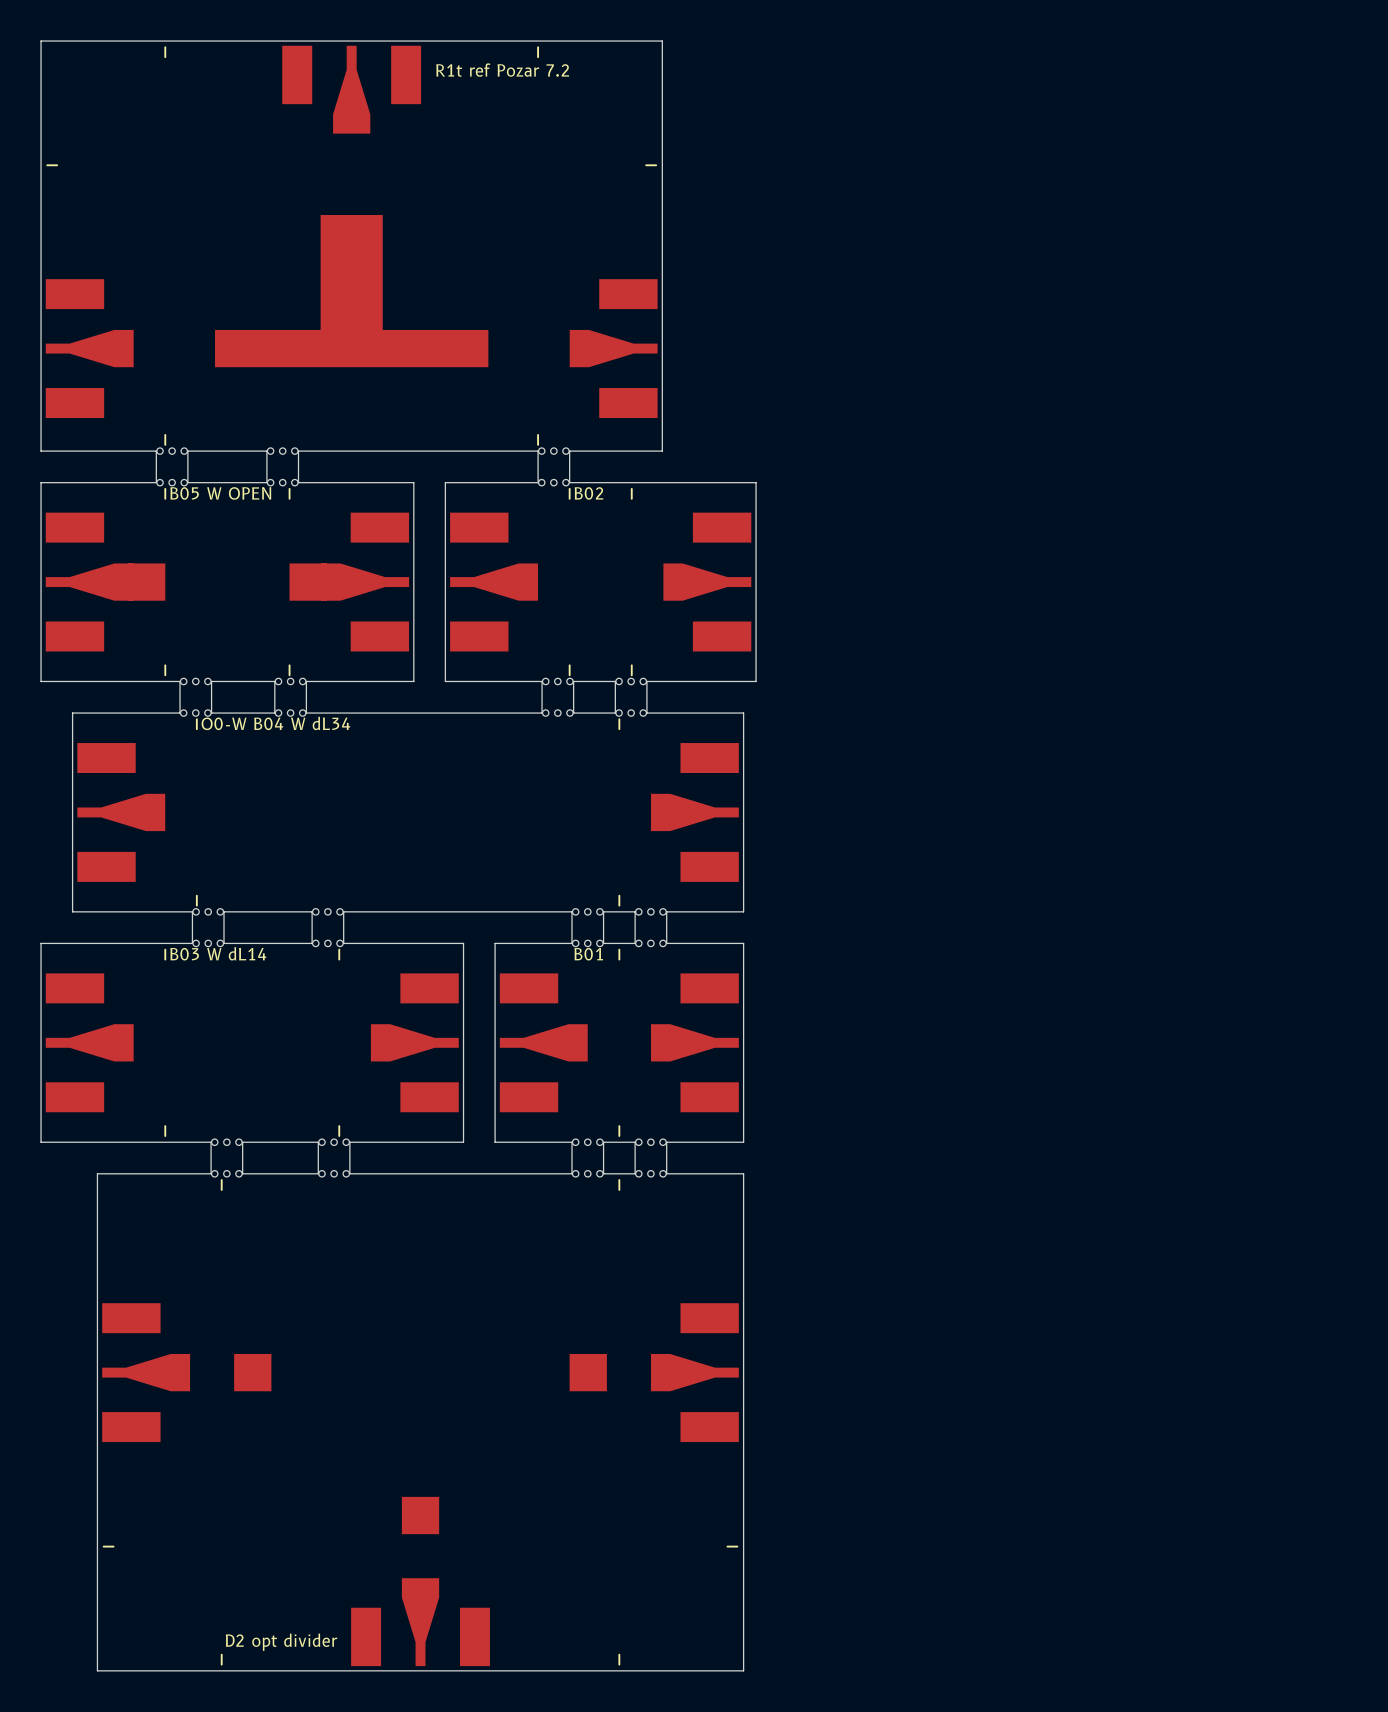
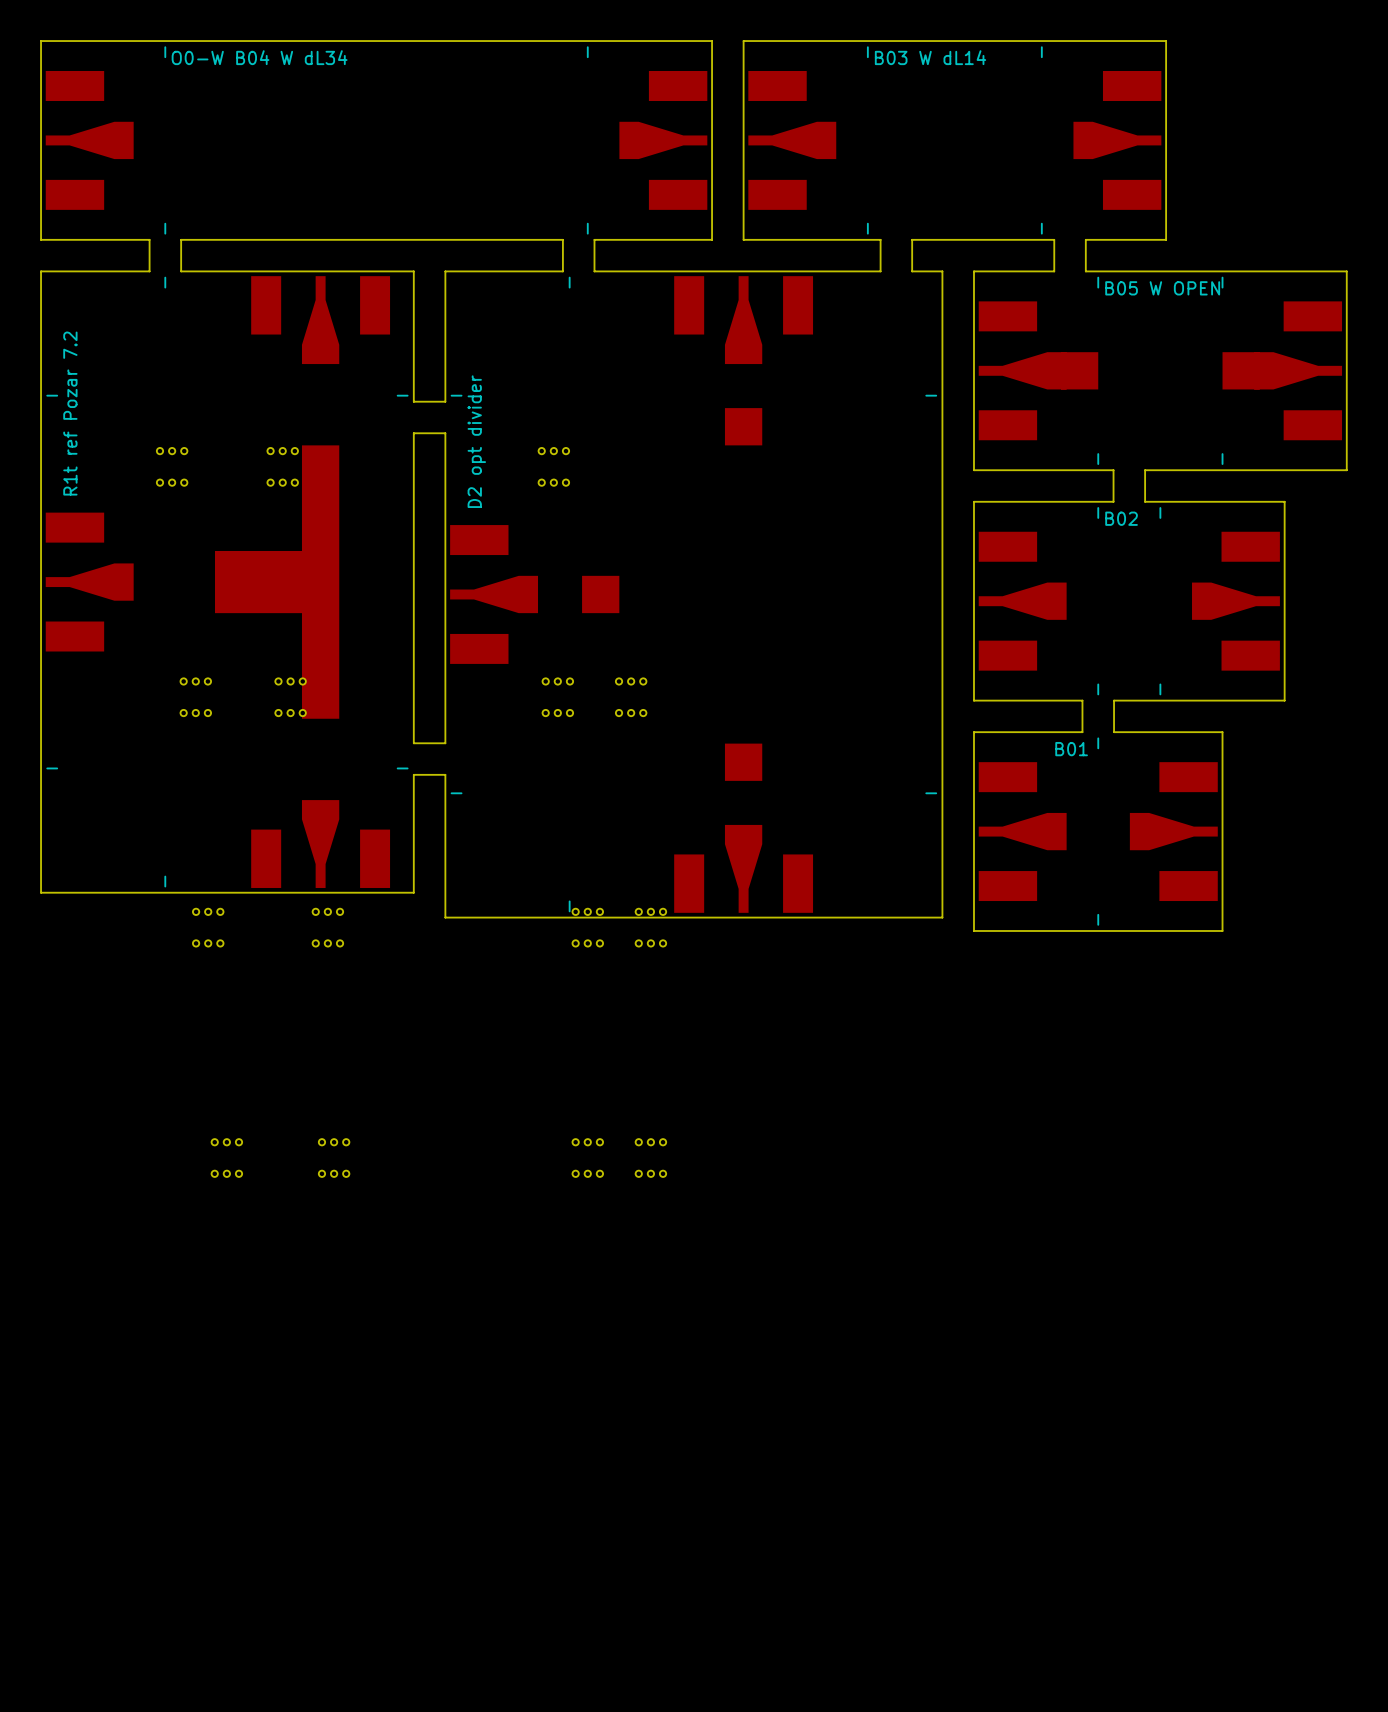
board edge: (662, 41) (662, 451) (569, 451) (569, 482) (756, 482) (756, 681) (646, 681) (646, 713) (743, 713) (743, 911) (666, 911) (666, 943) (743, 943) (743, 1142) (666, 1142) (666, 1173) (743, 1173) (743, 1670) (97, 1670) (97, 1173) (211, 1173) (211, 1142) (41, 1142) (41, 943) (192, 943) (192, 911) (72, 911) (72, 713) (180, 713) (180, 681) (41, 681) -> (662, 41) (712, 41) (712, 239) (594, 239) (594, 271) (880, 271) (880, 239) (743, 239) (743, 41) (1166, 41) (1166, 239) (1085, 239) (1085, 271) (1346, 271) (1346, 470) (1145, 470) (1145, 501) (1284, 501) (1284, 700) (1114, 700) (1114, 732) (1222, 732) (1222, 930) (973, 930) (973, 732) (1082, 732) (1082, 700) (973, 700) (973, 501) (1113, 501) (1113, 470) (973, 470) (973, 271) (1054, 271) (1054, 239) (912, 239) (912, 271) (942, 271) (942, 917) (445, 917) (445, 774) (413, 774) (413, 892) (41, 892) (41, 681)
line: (538, 47) (538, 57) -> (587, 47) (587, 57)
line: none -> (867, 47) (867, 57)
line: none -> (1041, 47) (1041, 57)
text: none -> O0-W B04 W dL34 (259, 57)
text: none -> B03 W dL14 (930, 57)
text: R1t ref Pozar 7.2 (502, 70) -> none
part: (351, 89) -> none
part: none -> (89, 140)
part: none -> (663, 140)
part: none -> (792, 140)
part: none -> (1117, 140)
line: (47, 165) (57, 165) -> (47, 395) (57, 395)
line: (646, 165) (656, 165) -> (451, 395) (461, 395)
line: none -> (867, 223) (867, 233)
line: none -> (1041, 223) (1041, 233)
board edge: (41, 239) (41, 271) -> (41, 239) (149, 239) (149, 271) (41, 271)
board edge: none -> (181, 239) (562, 239) (562, 271) (445, 271) (445, 401) (413, 401) (413, 271) (181, 271) (181, 239)
line: none -> (1098, 277) (1098, 287)
line: none -> (1222, 277) (1222, 287)
text: none -> B05 W OPEN (1162, 288)
part: (351, 291) -> none
part: none -> (320, 320)
part: none -> (743, 320)
part: (89, 348) -> none
part: (613, 348) -> none
part: none -> (1022, 370)
part: none -> (1079, 370)
part: none -> (1241, 370)
part: none -> (1298, 370)
line: none -> (397, 395) (407, 395)
line: none -> (926, 395) (936, 395)
part: none -> (743, 426)
text: none -> R1t ref Pozar 7.2 (70, 413)
line: (165, 434) (165, 444) -> (165, 223) (165, 233)
line: (538, 434) (538, 444) -> (587, 223) (587, 233)
board edge: (41, 451) (156, 451) (156, 482) (41, 482) -> (41, 451) (41, 482)
board edge: (187, 451) (266, 451) (266, 482) (187, 482) (187, 451) -> none
text: none -> D2 opt divider (476, 441)
line: none -> (1098, 454) (1098, 464)
line: none -> (1222, 454) (1222, 464)
board edge: (413, 482) (298, 482) (298, 451) (538, 451) (538, 482) (445, 482) -> (413, 482) (413, 433) (445, 433) (445, 482)
line: (165, 488) (165, 498) -> (165, 277) (165, 287)
line: (289, 488) (289, 498) -> none
line: (569, 488) (569, 498) -> (569, 277) (569, 287)
line: (631, 488) (631, 498) -> none
text: B05 W OPEN (220, 493) -> none
text: B02 (588, 493) -> none
line: none -> (1098, 508) (1098, 517)
line: none -> (1160, 508) (1160, 517)
text: none -> B02 (1121, 518)
part: (146, 582) -> none
part: none -> (277, 582)
part: (308, 582) -> none
part: (365, 582) -> none
part position: (494, 582) -> (494, 594)
part: (707, 582) -> none
part: none -> (600, 594)
part: none -> (1022, 601)
part: none -> (1235, 601)
line: (165, 665) (165, 675) -> none
line: (289, 665) (289, 675) -> none
line: (569, 665) (569, 675) -> none
line: (631, 665) (631, 675) -> none
board edge: (211, 681) (274, 681) (274, 713) (211, 713) (211, 681) -> none
board edge: (413, 681) (306, 681) (306, 713) (542, 713) (542, 681) (445, 681) -> (413, 681) (413, 743) (445, 743) (445, 681)
board edge: (573, 681) (615, 681) (615, 713) (573, 713) (573, 681) -> none
line: none -> (1098, 684) (1098, 694)
line: none -> (1160, 684) (1160, 694)
line: (196, 719) (196, 729) -> none
line: (619, 719) (619, 729) -> none
text: O0-W B04 W dL34 (275, 723) -> none
line: none -> (1098, 738) (1098, 748)
text: none -> B01 (1071, 749)
part: none -> (743, 762)
line: none -> (47, 768) (57, 768)
line: none -> (397, 768) (407, 768)
line: none -> (451, 793) (461, 793)
line: none -> (926, 793) (936, 793)
part: (121, 812) -> none
part rotation: 0° (694, 812) -> 90° clockwise (743, 868)
part: none -> (1022, 831)
part: none -> (1173, 831)
part: none -> (320, 844)
line: (196, 895) (196, 905) -> (165, 876) (165, 886)
line: (619, 895) (619, 905) -> (569, 901) (569, 911)
board edge: (224, 911) (312, 911) (312, 943) (224, 943) (224, 911) -> none
board edge: (343, 911) (572, 911) (572, 943) (495, 943) (495, 1142) (572, 1142) (572, 1173) (349, 1173) (349, 1142) (463, 1142) (463, 943) (343, 943) (343, 911) -> none
board edge: (603, 911) (635, 911) (635, 943) (603, 943) (603, 911) -> none
line: none -> (1098, 914) (1098, 924)
line: (165, 949) (165, 959) -> none
line: (339, 949) (339, 959) -> none
line: (619, 949) (619, 959) -> none
text: B03 W dL14 (218, 953) -> none
text: B01 (588, 954) -> none
part: (89, 1042) -> none
part: (414, 1042) -> none
part: (543, 1042) -> none
part: (694, 1042) -> none
line: (165, 1126) (165, 1136) -> none
line: (339, 1126) (339, 1136) -> none
line: (619, 1126) (619, 1136) -> none
board edge: (242, 1142) (318, 1142) (318, 1173) (242, 1173) (242, 1142) -> none
board edge: (603, 1142) (635, 1142) (635, 1173) (603, 1173) (603, 1142) -> none
line: (221, 1180) (221, 1189) -> none
line: (619, 1180) (619, 1189) -> none
part: (146, 1372) -> none
part: (252, 1372) -> none
part: (588, 1372) -> none
part: (694, 1372) -> none
part: (420, 1515) -> none
line: (103, 1546) (113, 1546) -> none
line: (727, 1546) (737, 1546) -> none
part: (420, 1622) -> none
text: D2 opt divider (281, 1642) -> none
line: (221, 1654) (221, 1664) -> none
line: (619, 1654) (619, 1664) -> none

